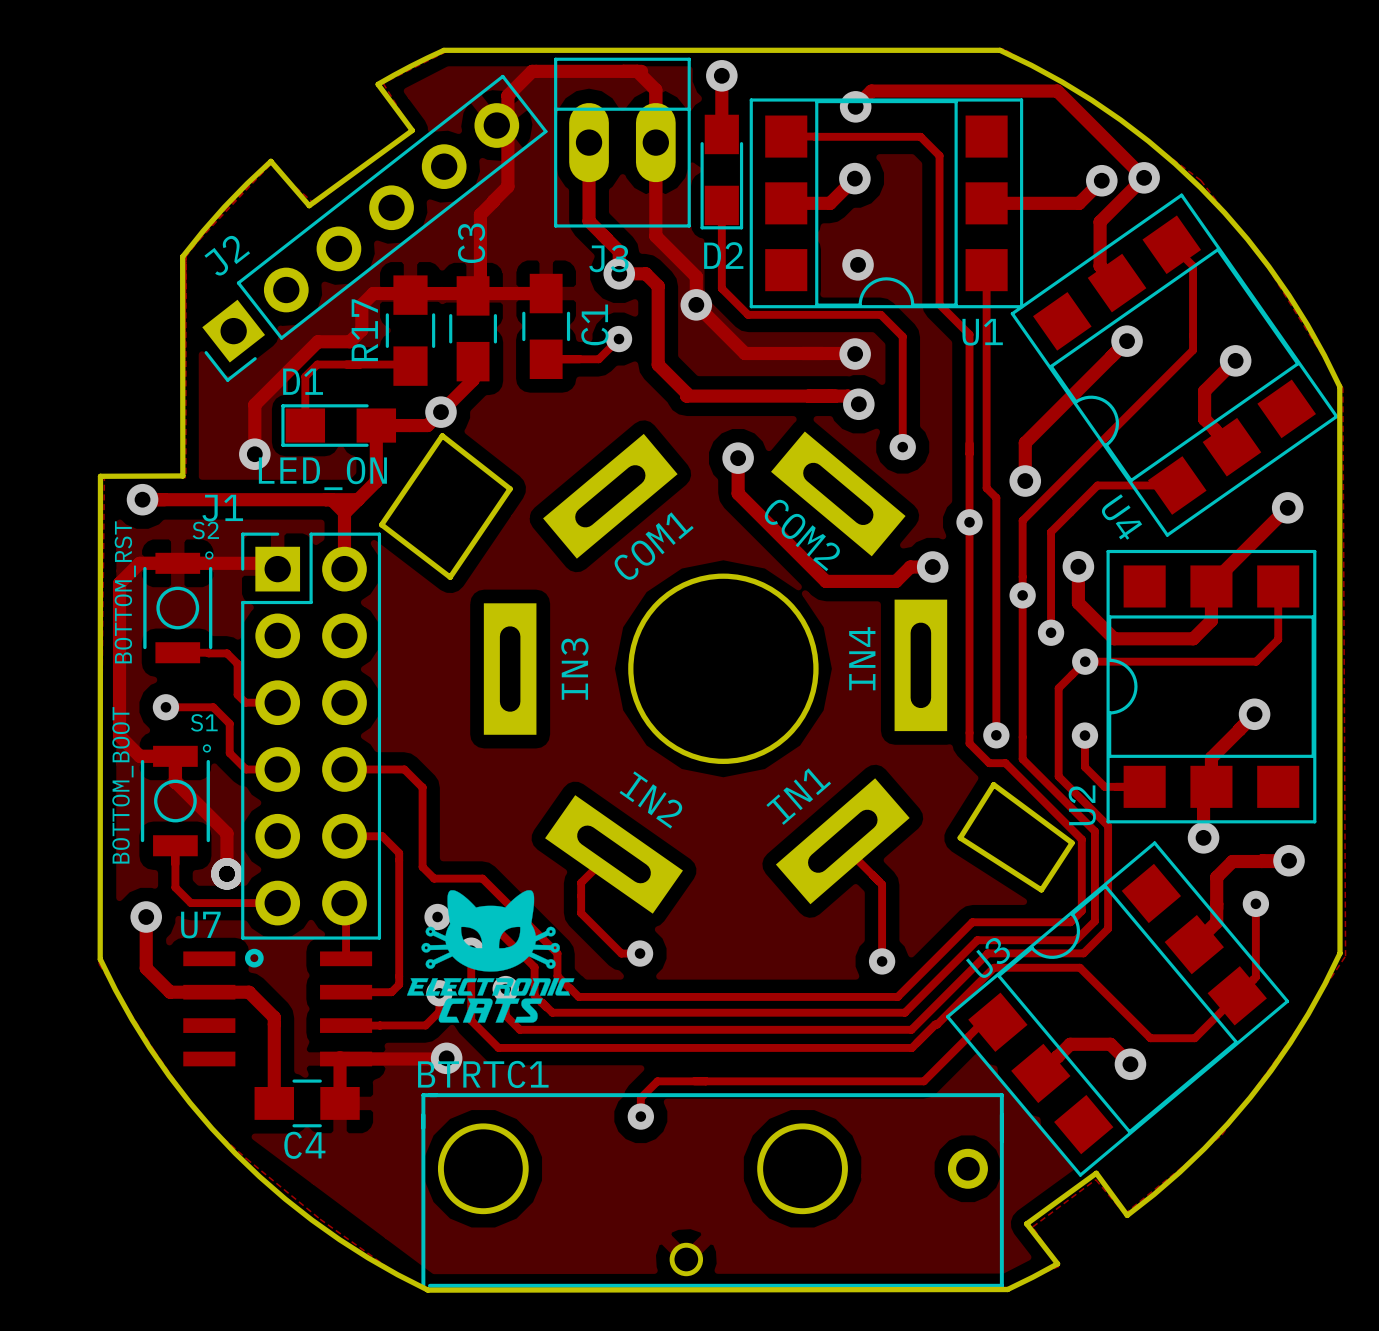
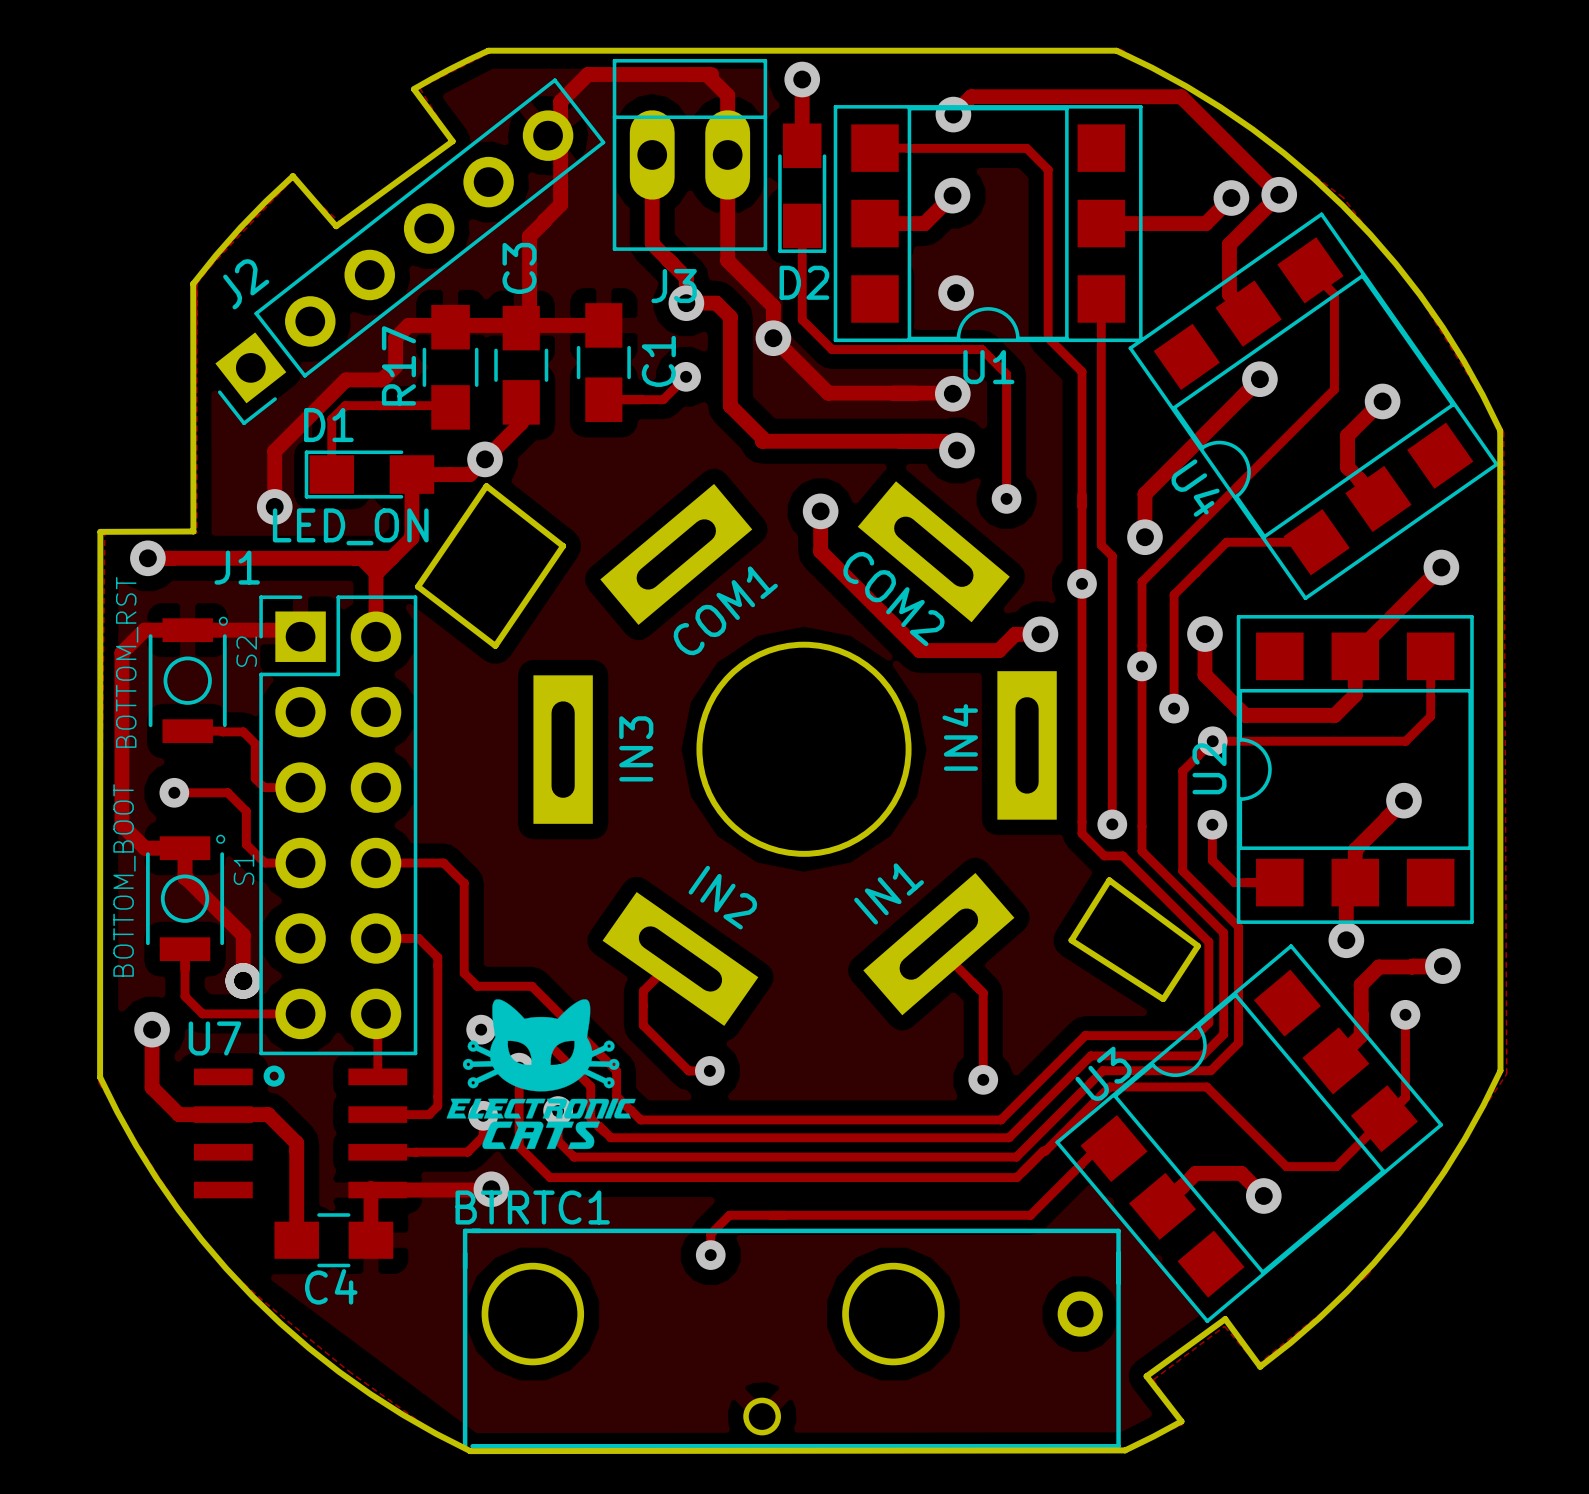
U1 name position: U1 (982, 332) -> U1 (988, 367)
U4 name position: U4 (1121, 516) -> U4 (1195, 488)
S2 name rotation: 0° (205, 530) -> 90° counterclockwise (246, 651)
S2 name position: S2 (205, 530) -> S2 (246, 651)
S1 name rotation: 0° (204, 722) -> 90° counterclockwise (244, 869)
S1 name position: S1 (204, 722) -> S1 (244, 869)
U2 name position: U2 (1082, 805) -> U2 (1209, 768)

